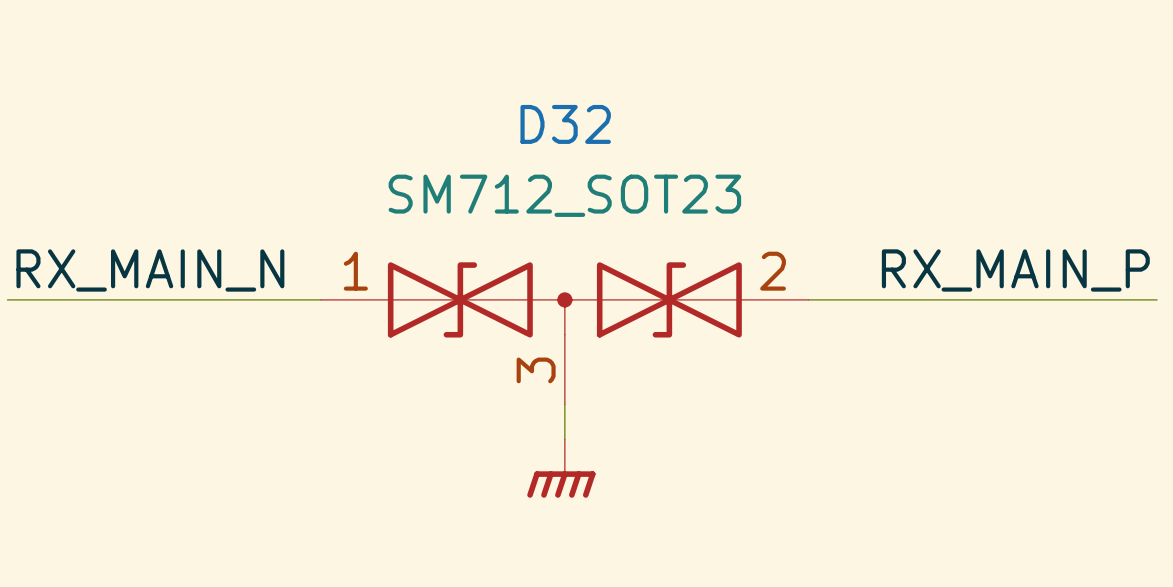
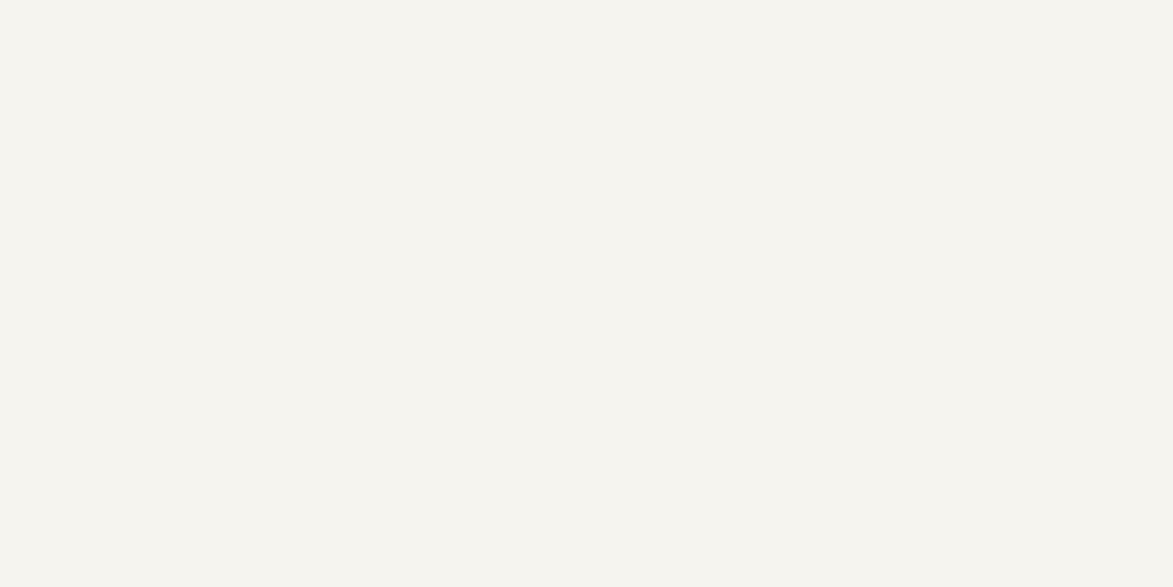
label: RX_MAIN_N (150, 270) -> none
label: RX_MAIN_P (1015, 270) -> none
wire: (7, 299) (321, 299) -> none
wire: (808, 299) (1157, 299) -> none
D32: SM712_SOT23 (564, 333) -> none
wire: (564, 404) (564, 439) -> none
power symbol: (561, 468) -> none

